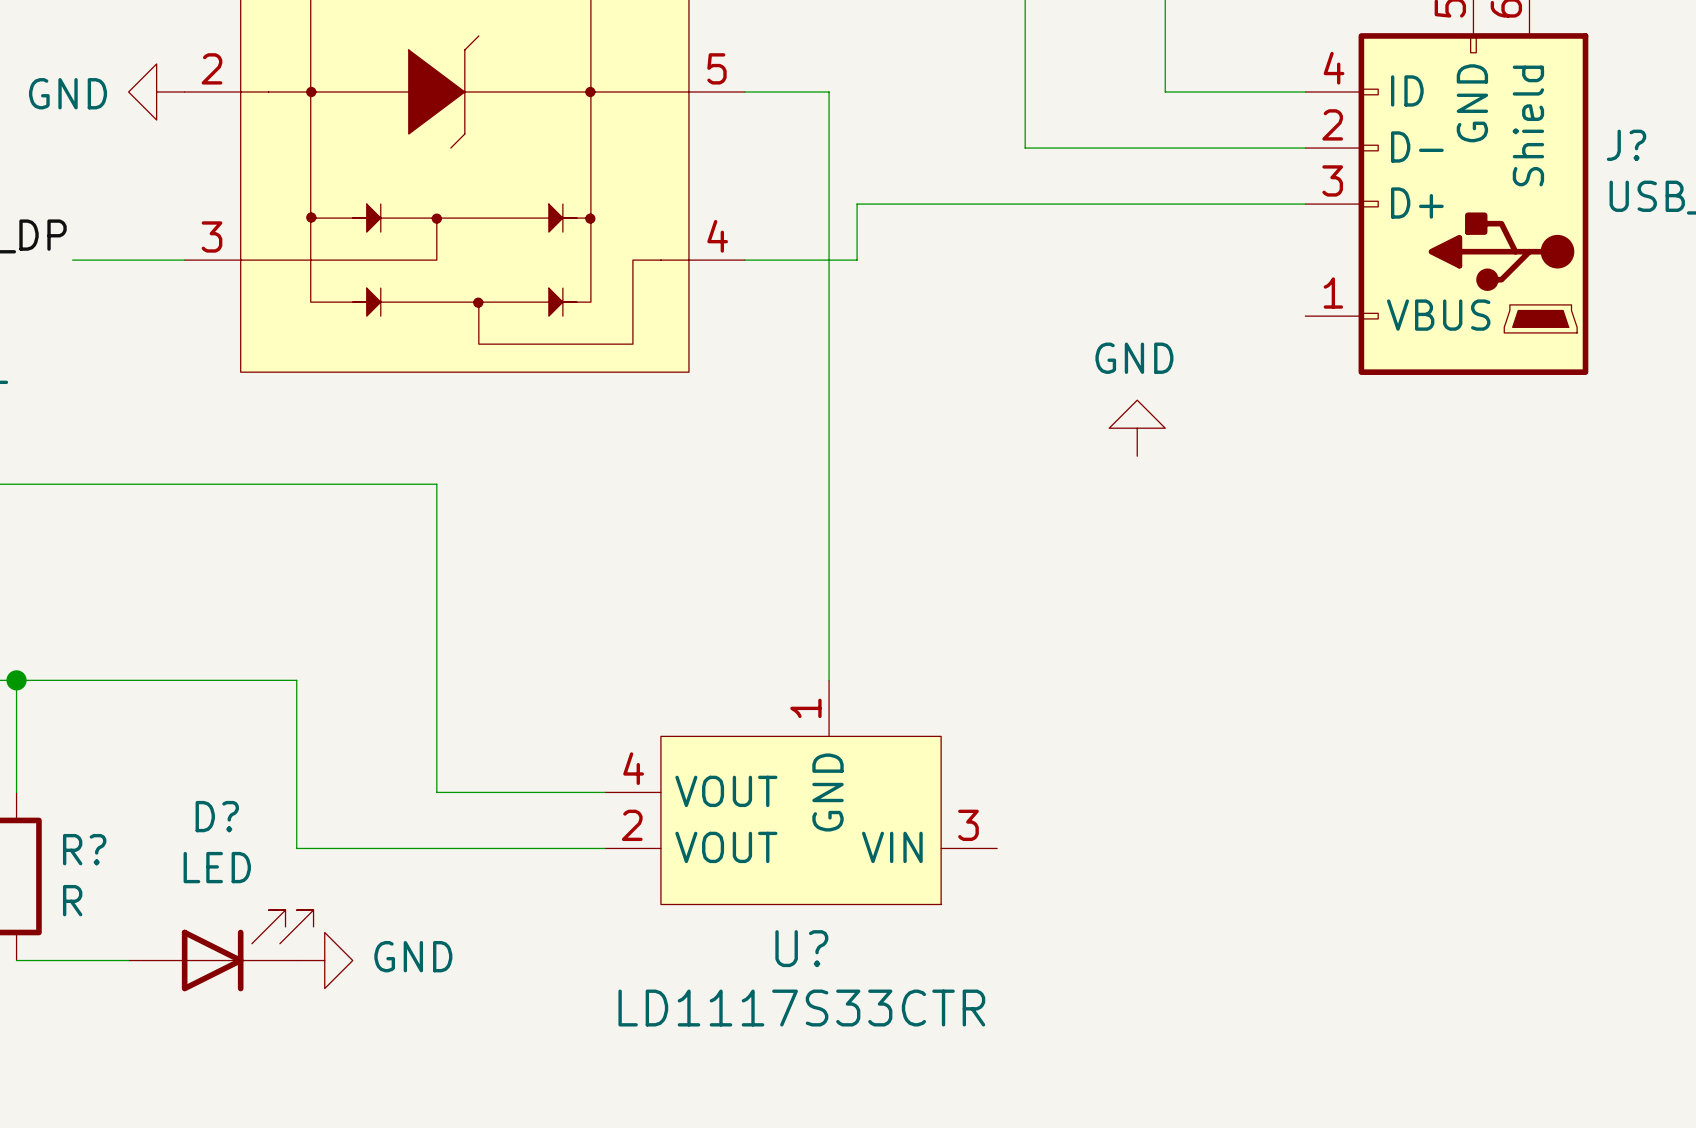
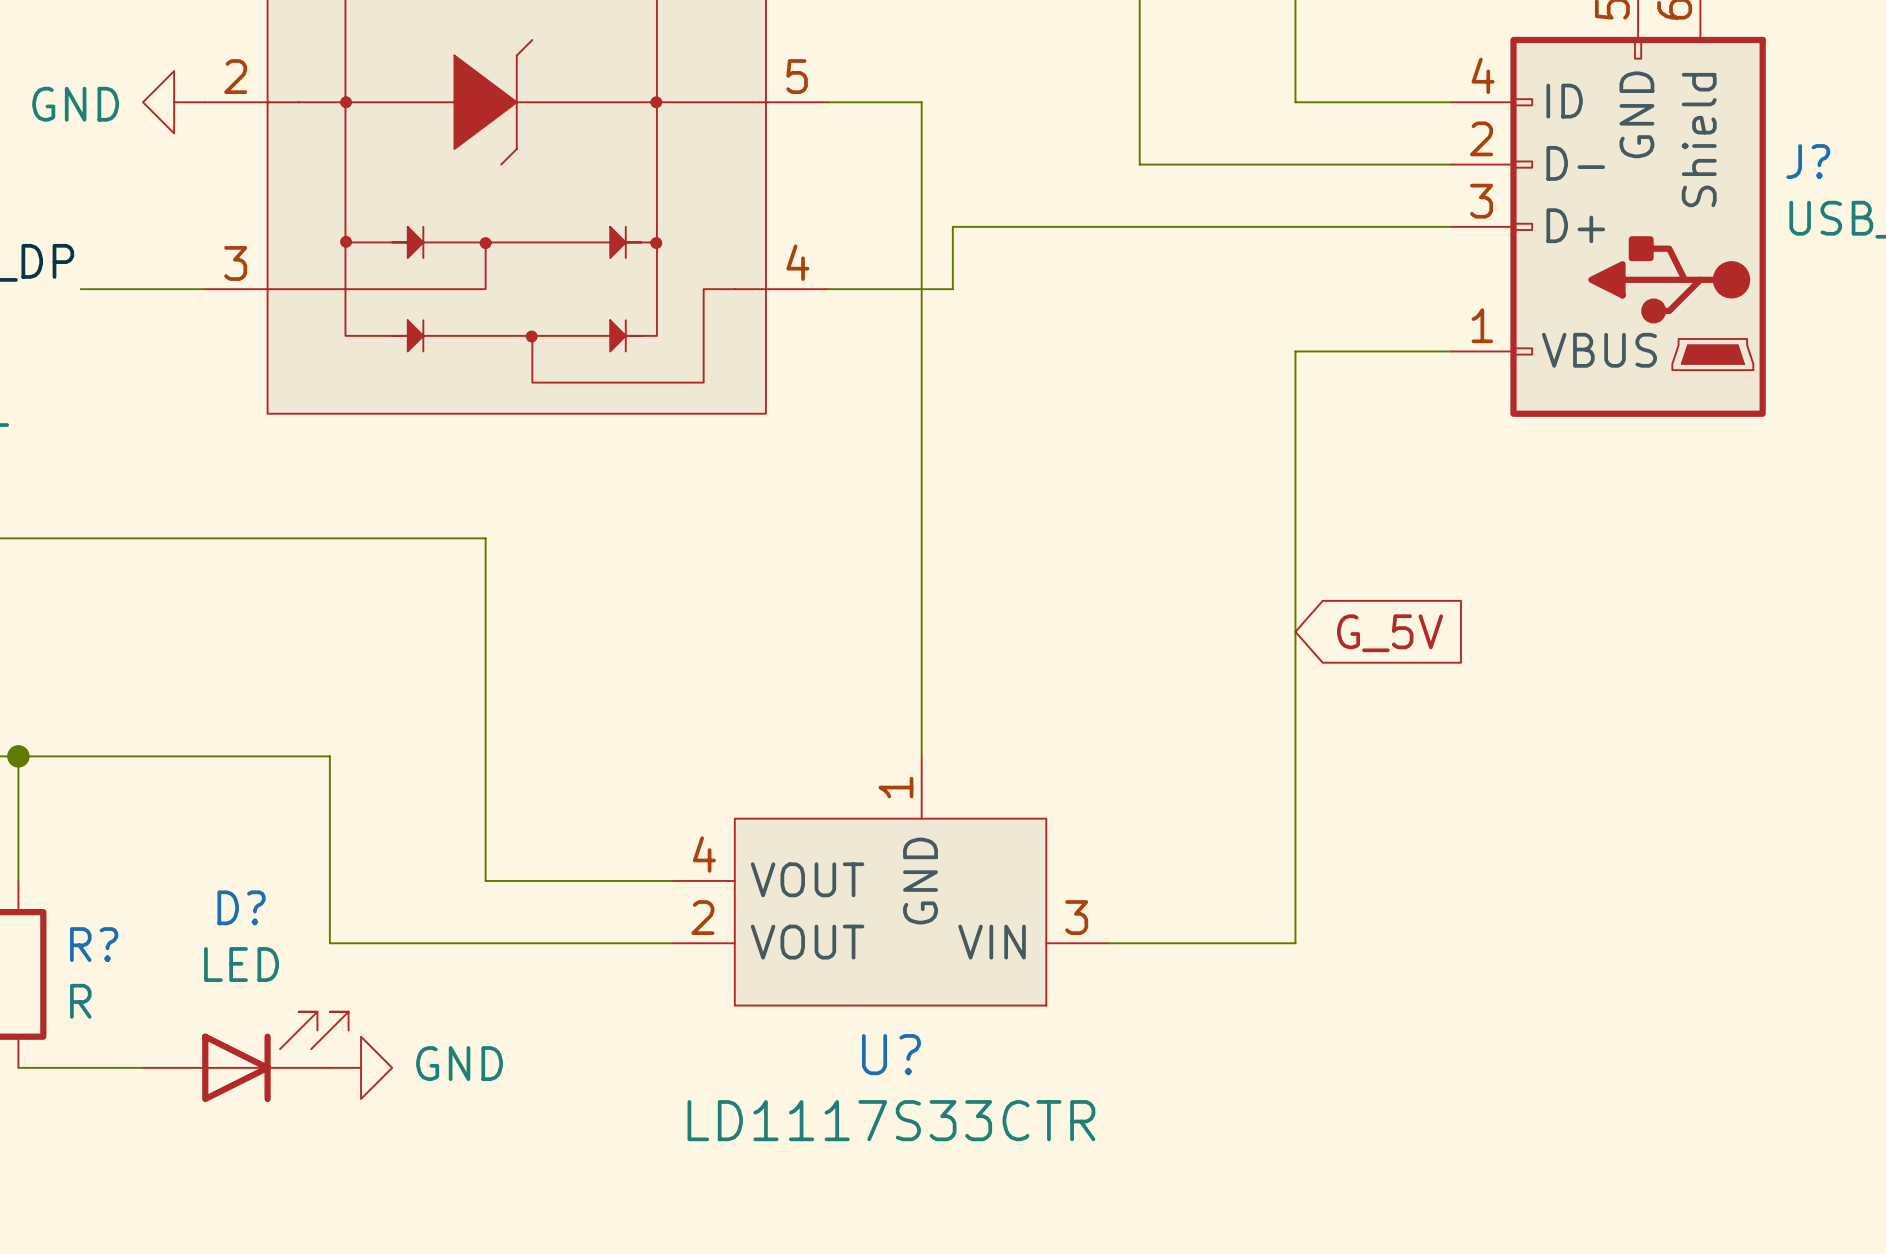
wire: none -> (1451, 351) (1295, 351) (1295, 943) (1108, 943)
power symbol: GND (1137, 428) -> none
global label: none -> G_5V (1390, 633)

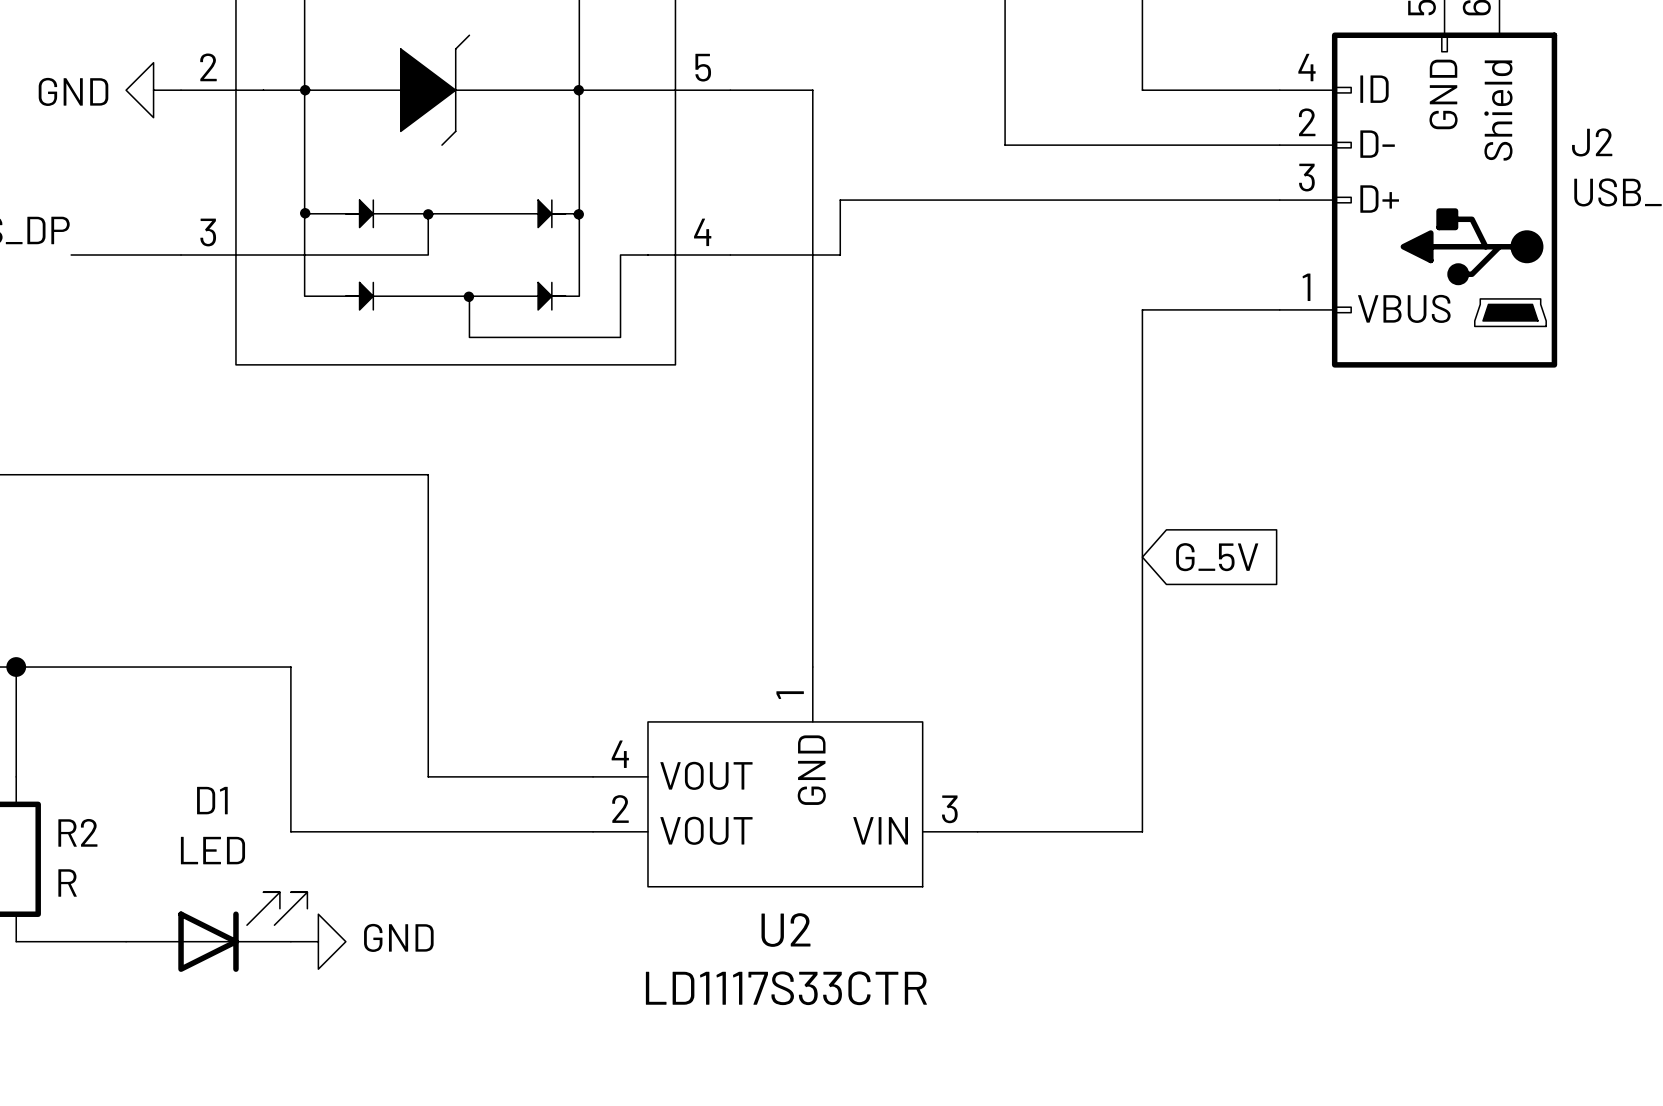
J? name: J? (1808, 161) -> J2 (1592, 142)
D? name: D? (241, 907) -> D1 (212, 800)
R? name: R? (94, 944) -> R2 (77, 832)
U? name: U? (891, 1054) -> U2 (785, 930)

